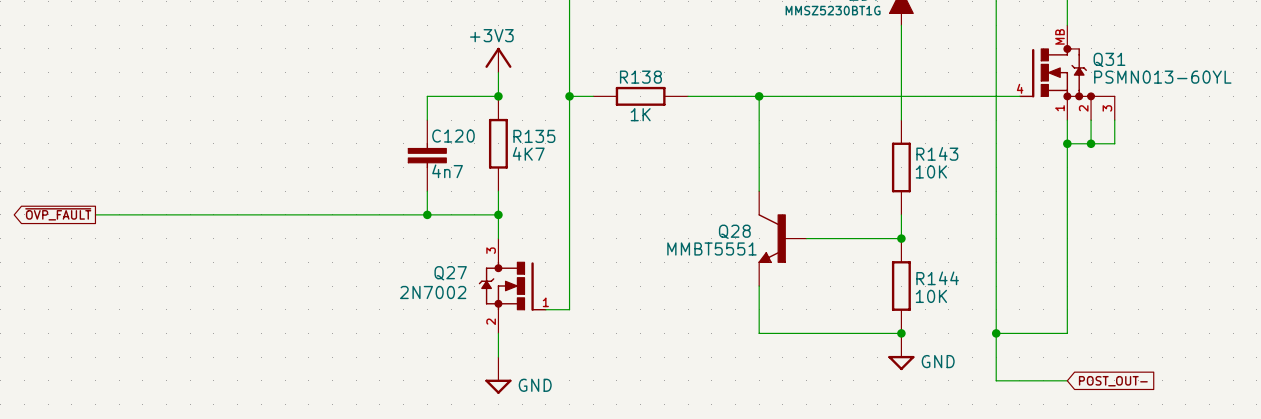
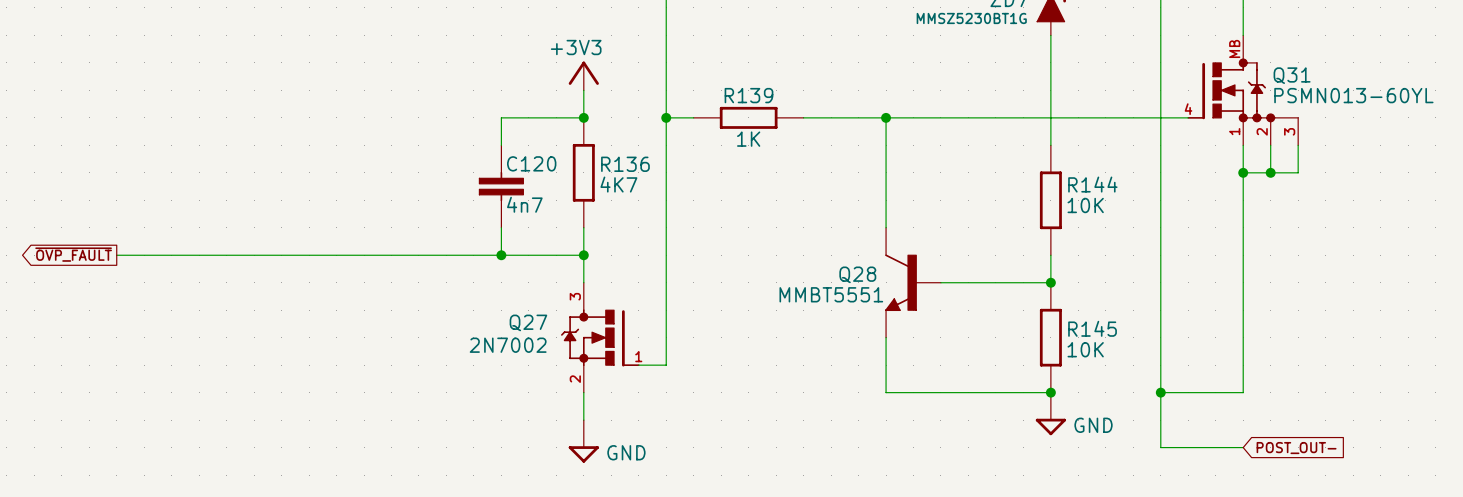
R138 name: R138 (640, 77) -> R139 (748, 95)
R135 name: R135 (534, 136) -> R136 (625, 164)
R143 name: R143 (937, 153) -> R144 (1092, 184)
R144 name: R144 (937, 278) -> R145 (1092, 328)

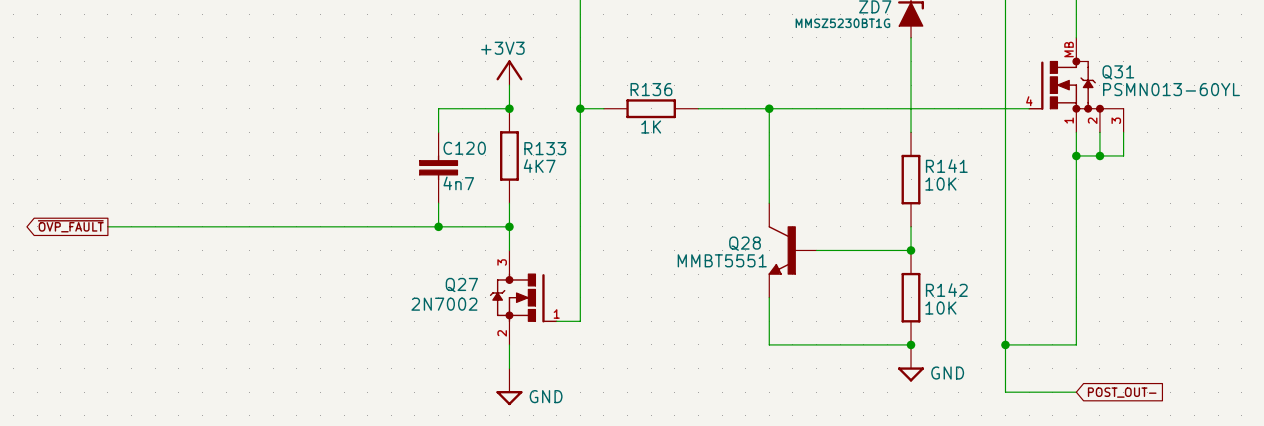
R139 name: R139 (748, 95) -> R136 (651, 89)
R136 name: R136 (625, 164) -> R133 (545, 148)
R144 name: R144 (1092, 184) -> R141 (946, 166)
R145 name: R145 (1092, 328) -> R142 (946, 290)

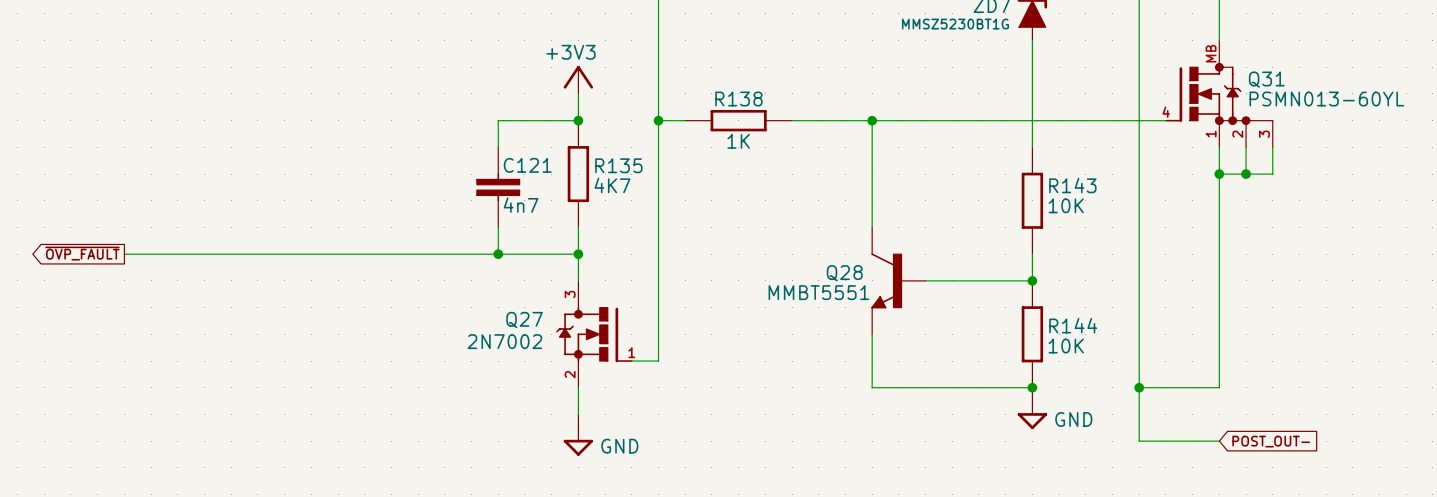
R136 name: R136 (651, 89) -> R138 (738, 99)
C120 name: C120 (464, 148) -> C121 (527, 165)
R133 name: R133 (545, 148) -> R135 (618, 165)
R141 name: R141 (946, 166) -> R143 (1072, 185)
R142 name: R142 (946, 290) -> R144 (1073, 325)

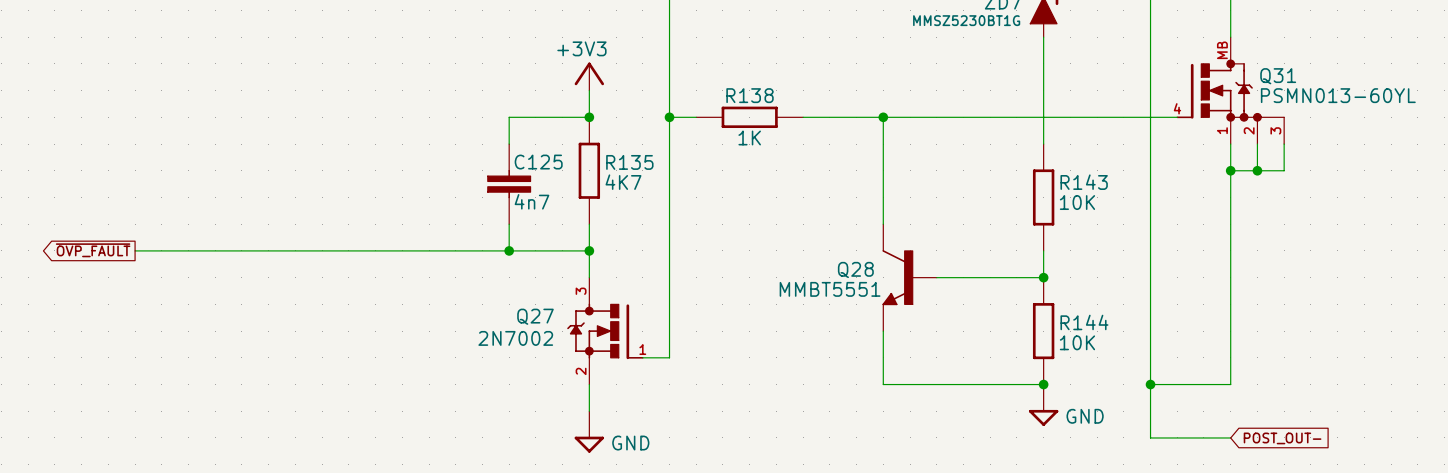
C121 name: C121 (527, 165) -> C125 (538, 162)

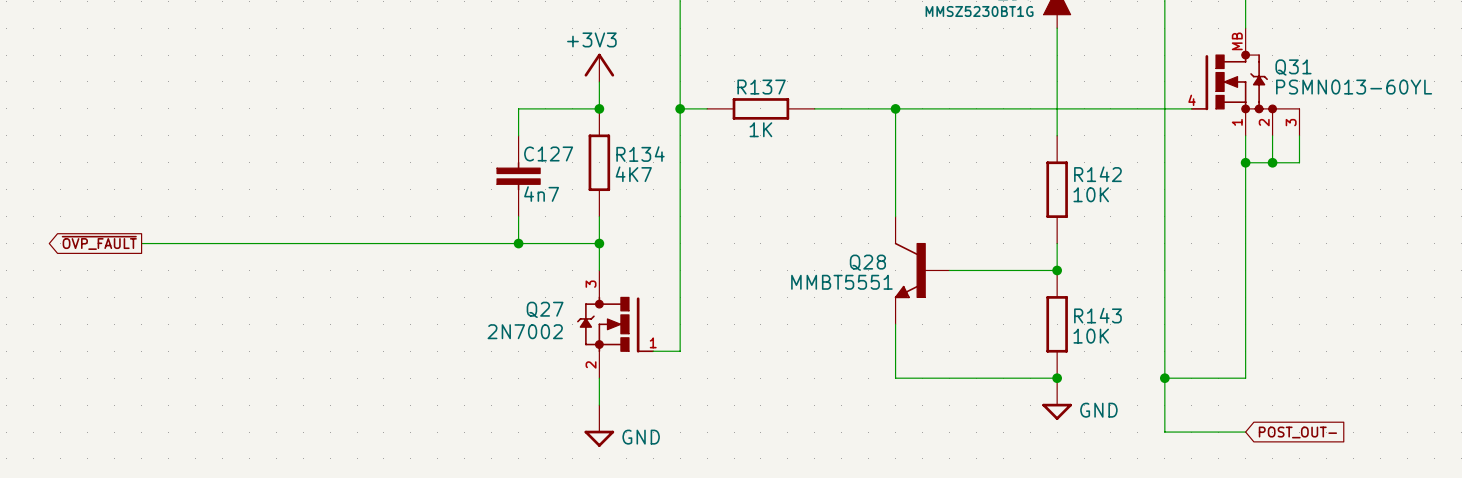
R138 name: R138 (750, 95) -> R137 (761, 87)
C125 name: C125 (538, 162) -> C127 (548, 153)
R135 name: R135 (629, 162) -> R134 (640, 154)
R143 name: R143 (1084, 182) -> R142 (1097, 174)
R144 name: R144 (1084, 322) -> R143 (1097, 315)

